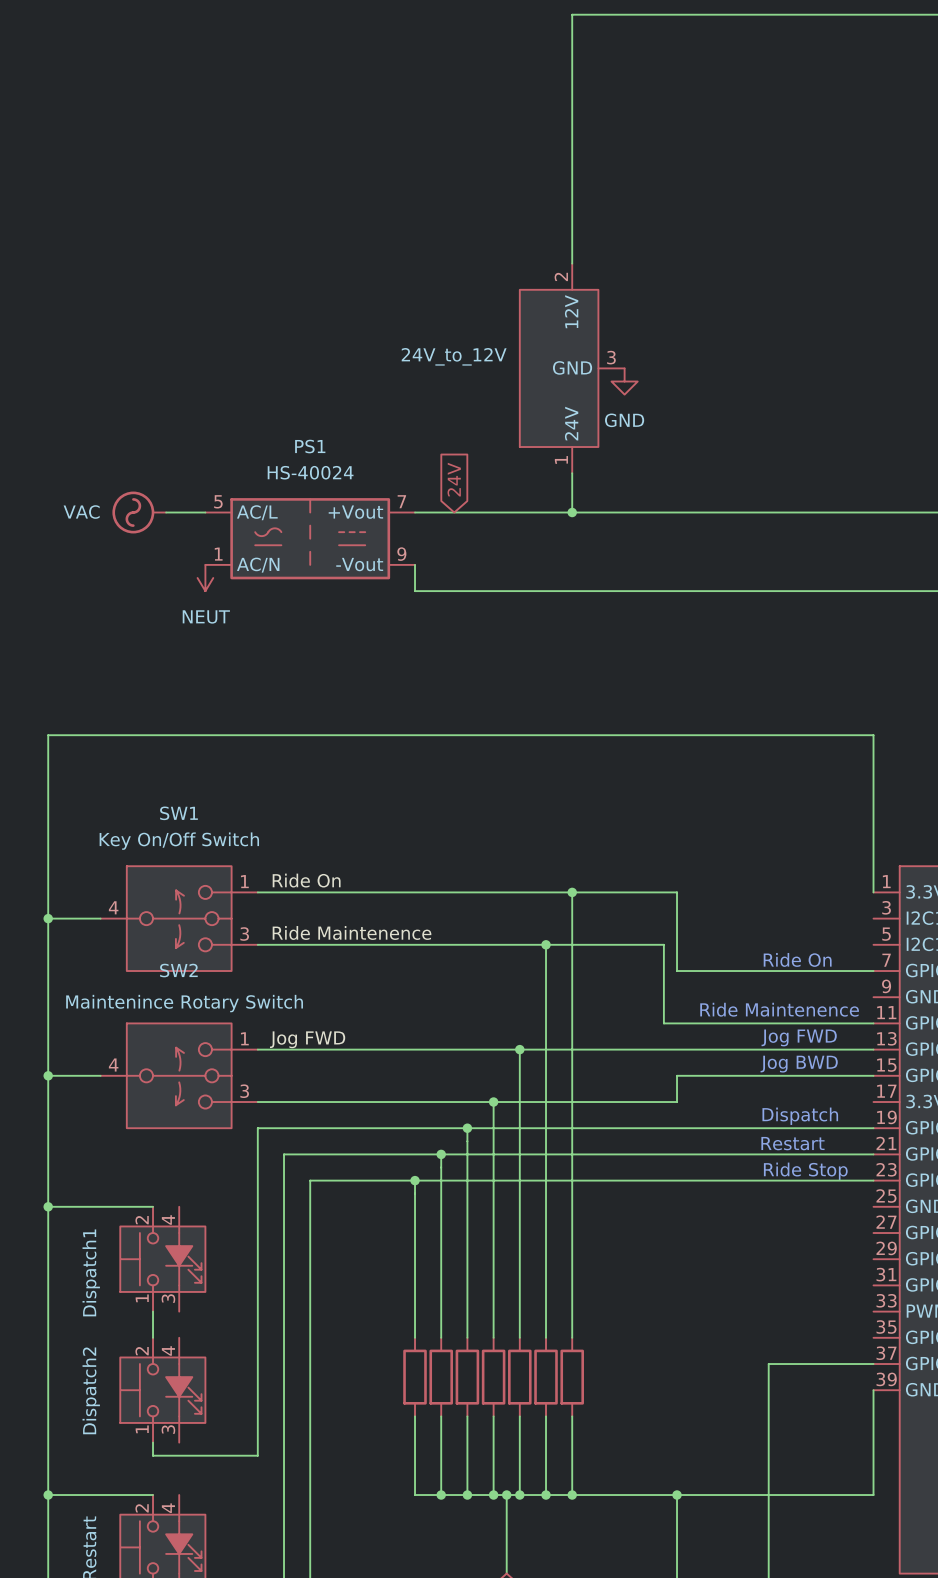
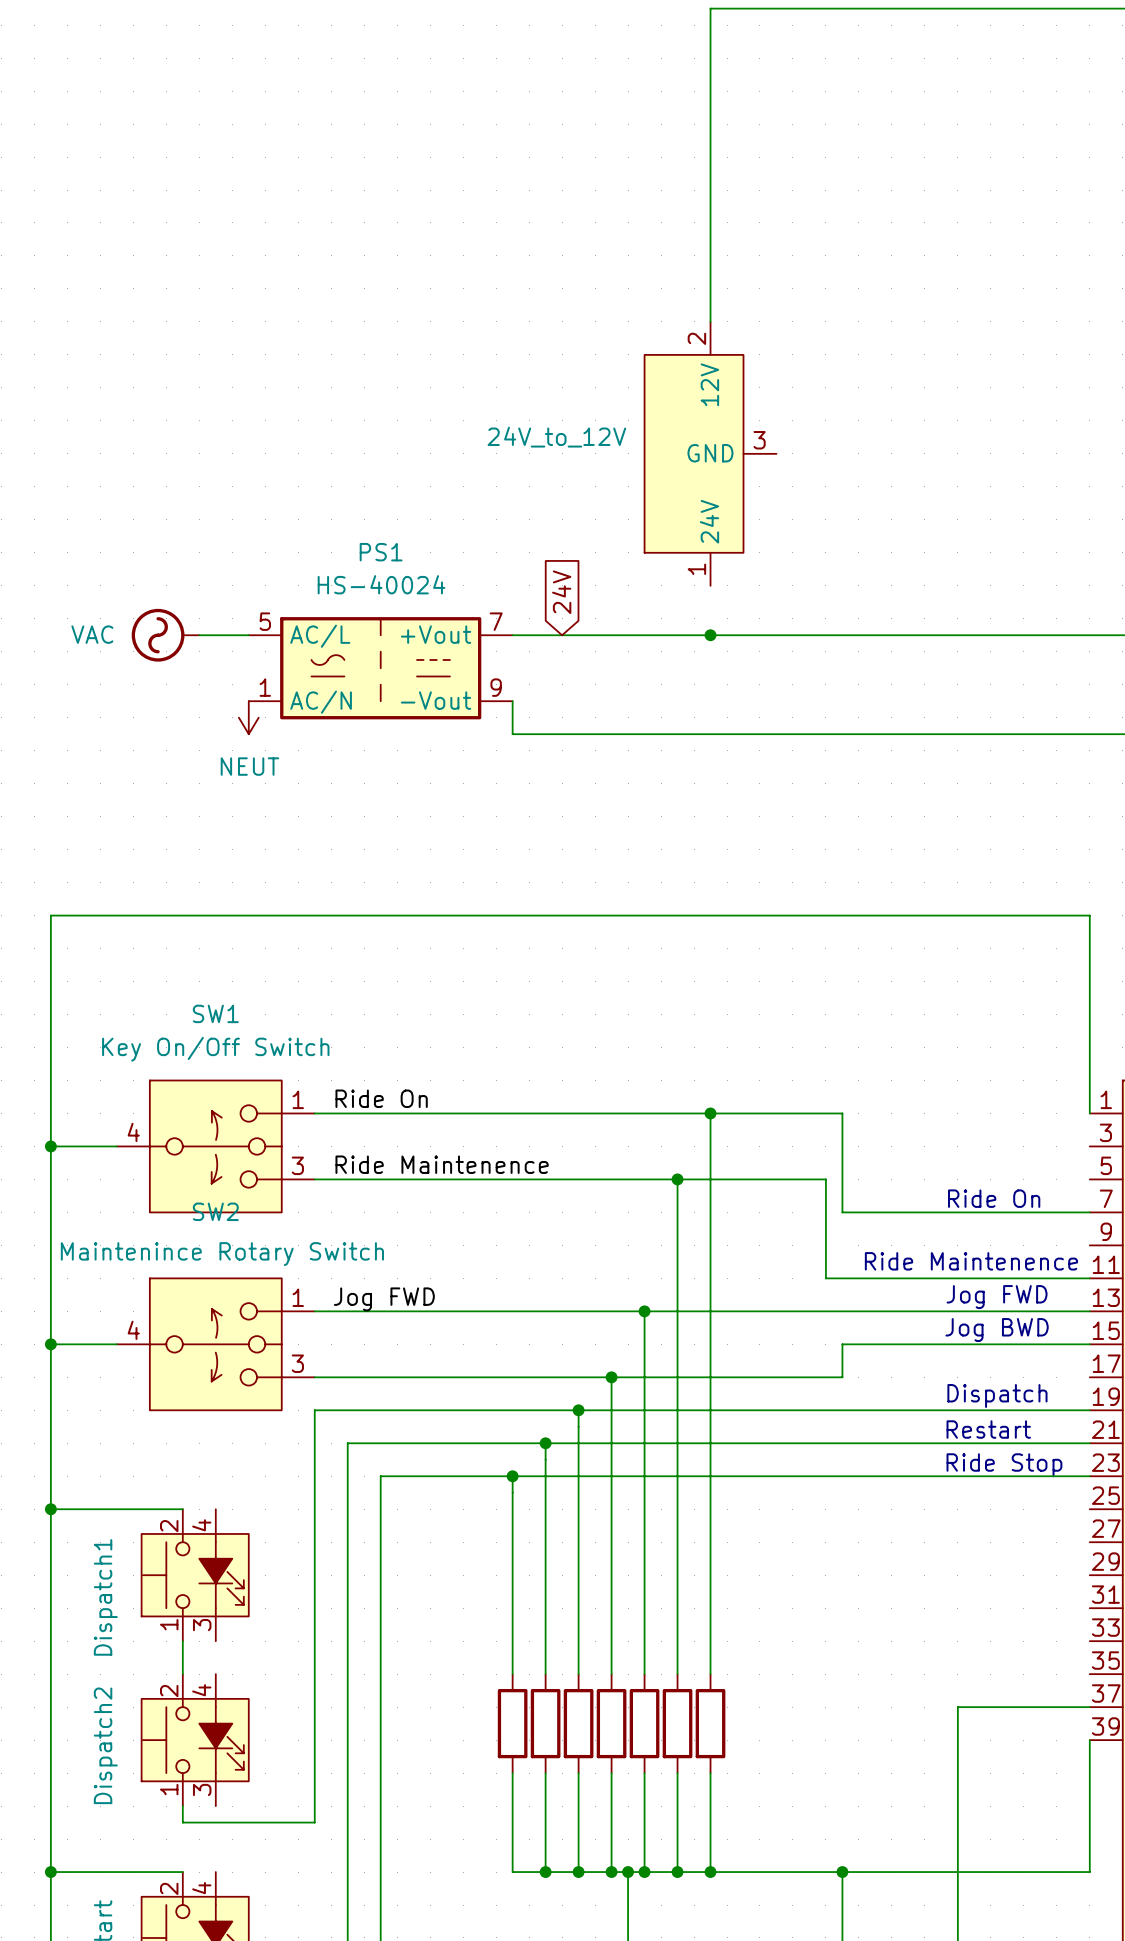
power symbol: GND (624, 381) -> none
wire: (572, 473) (572, 512) -> none

